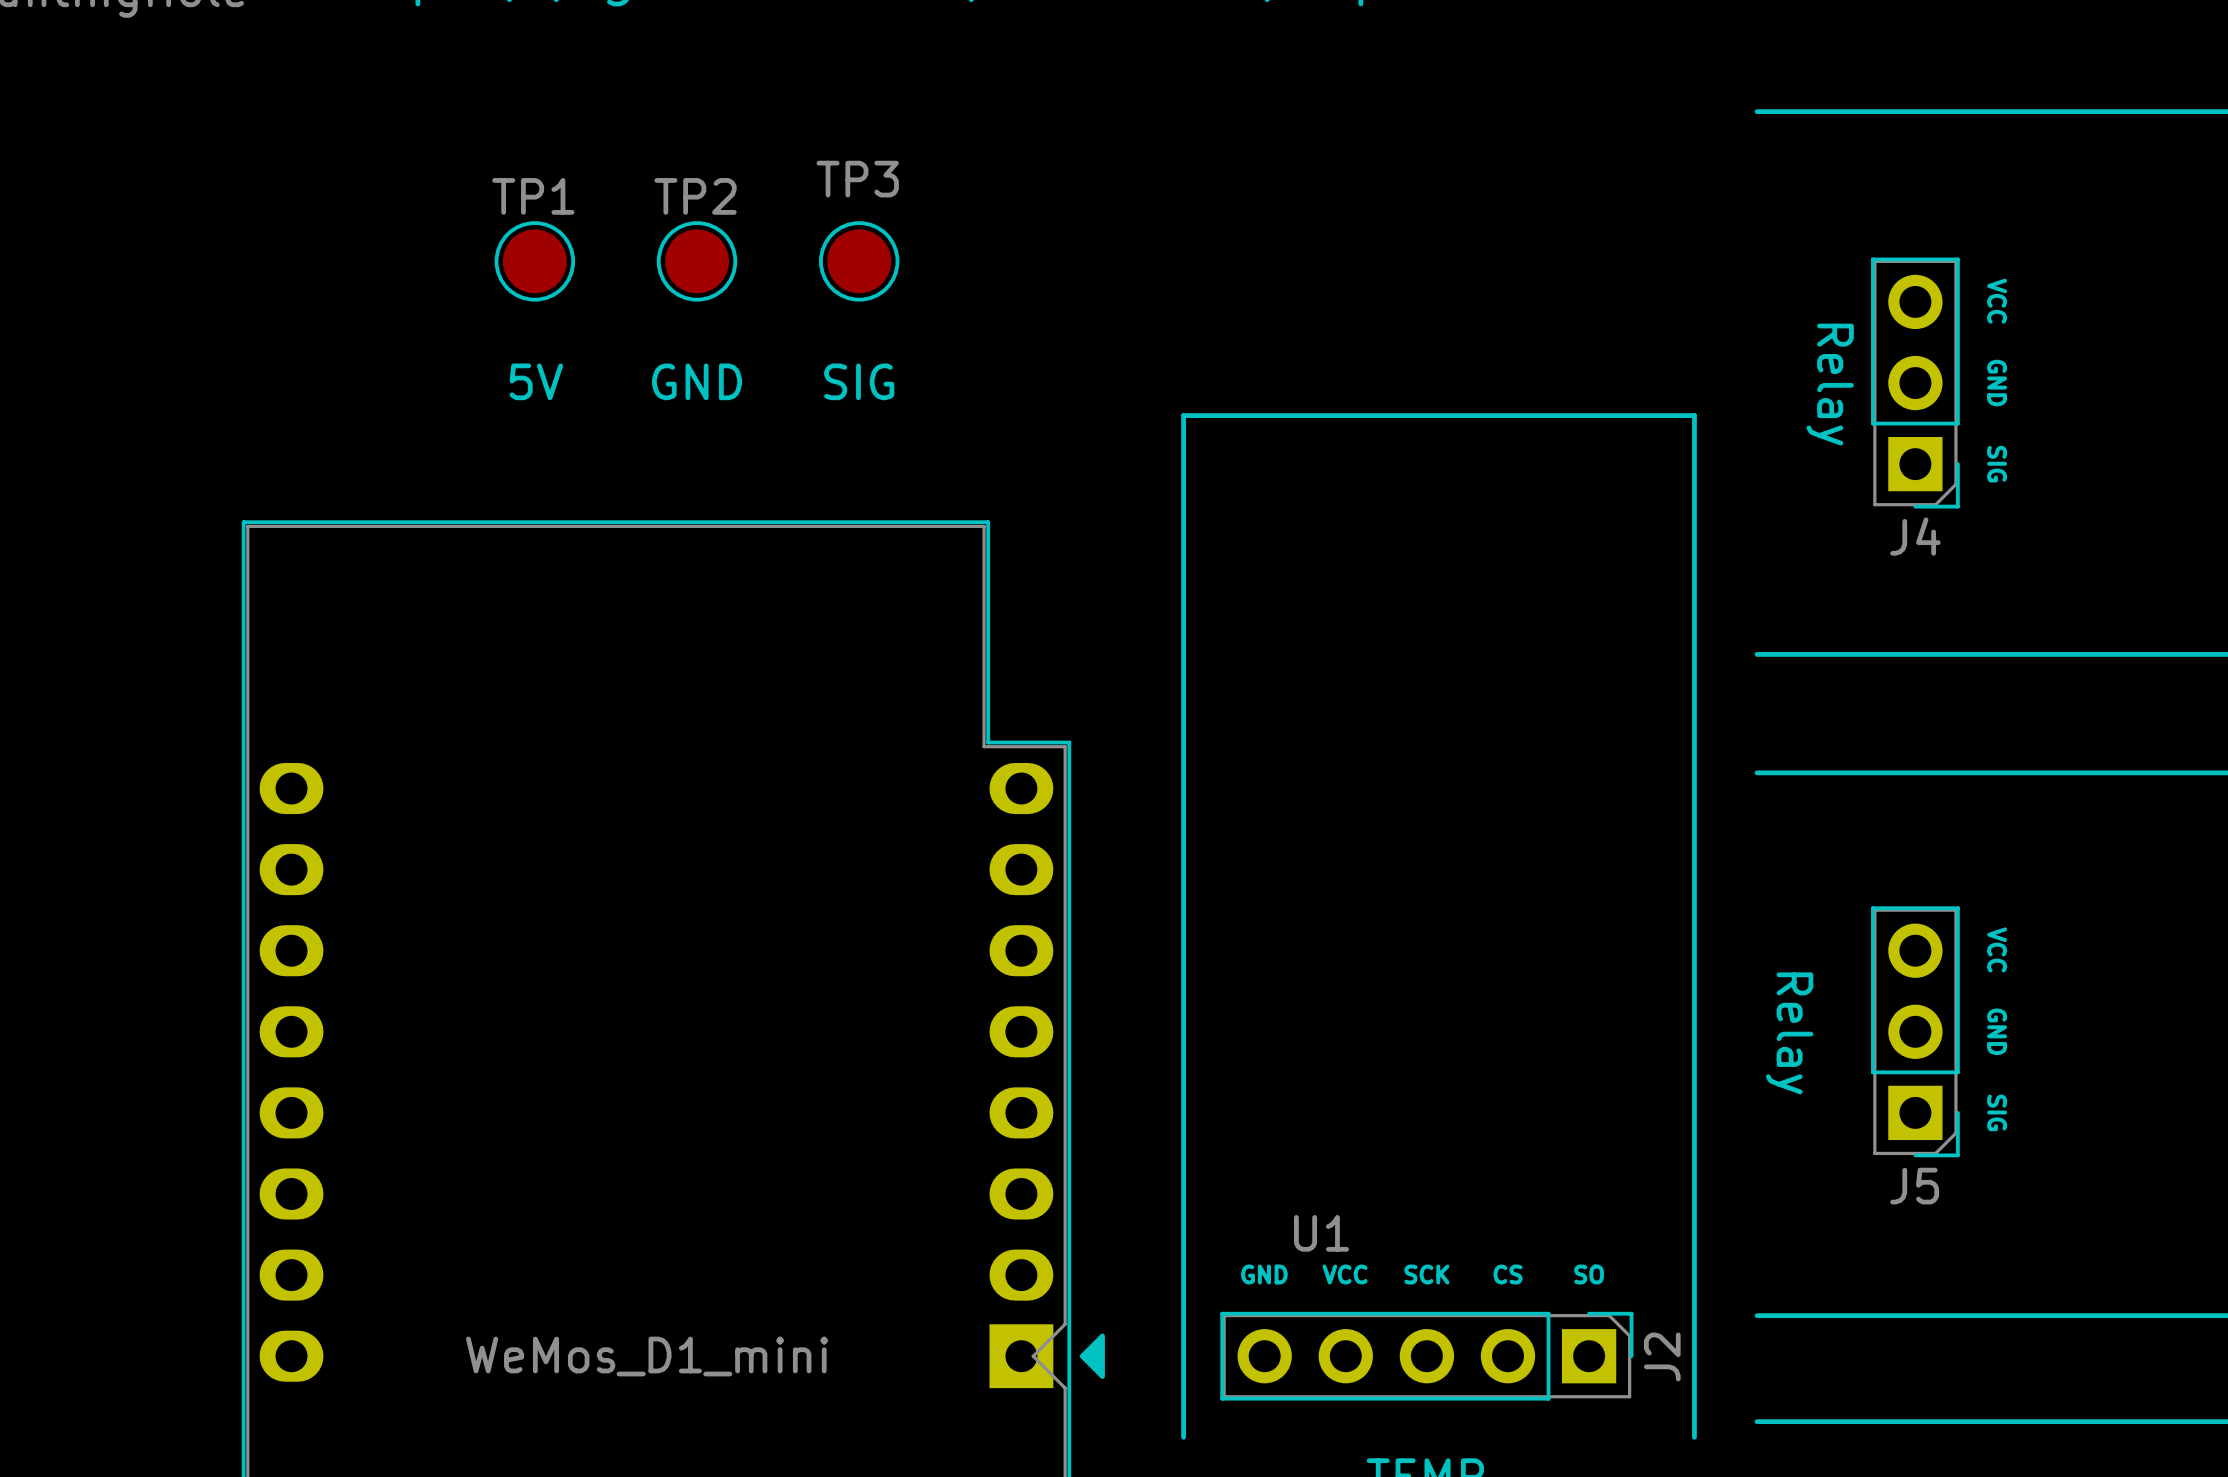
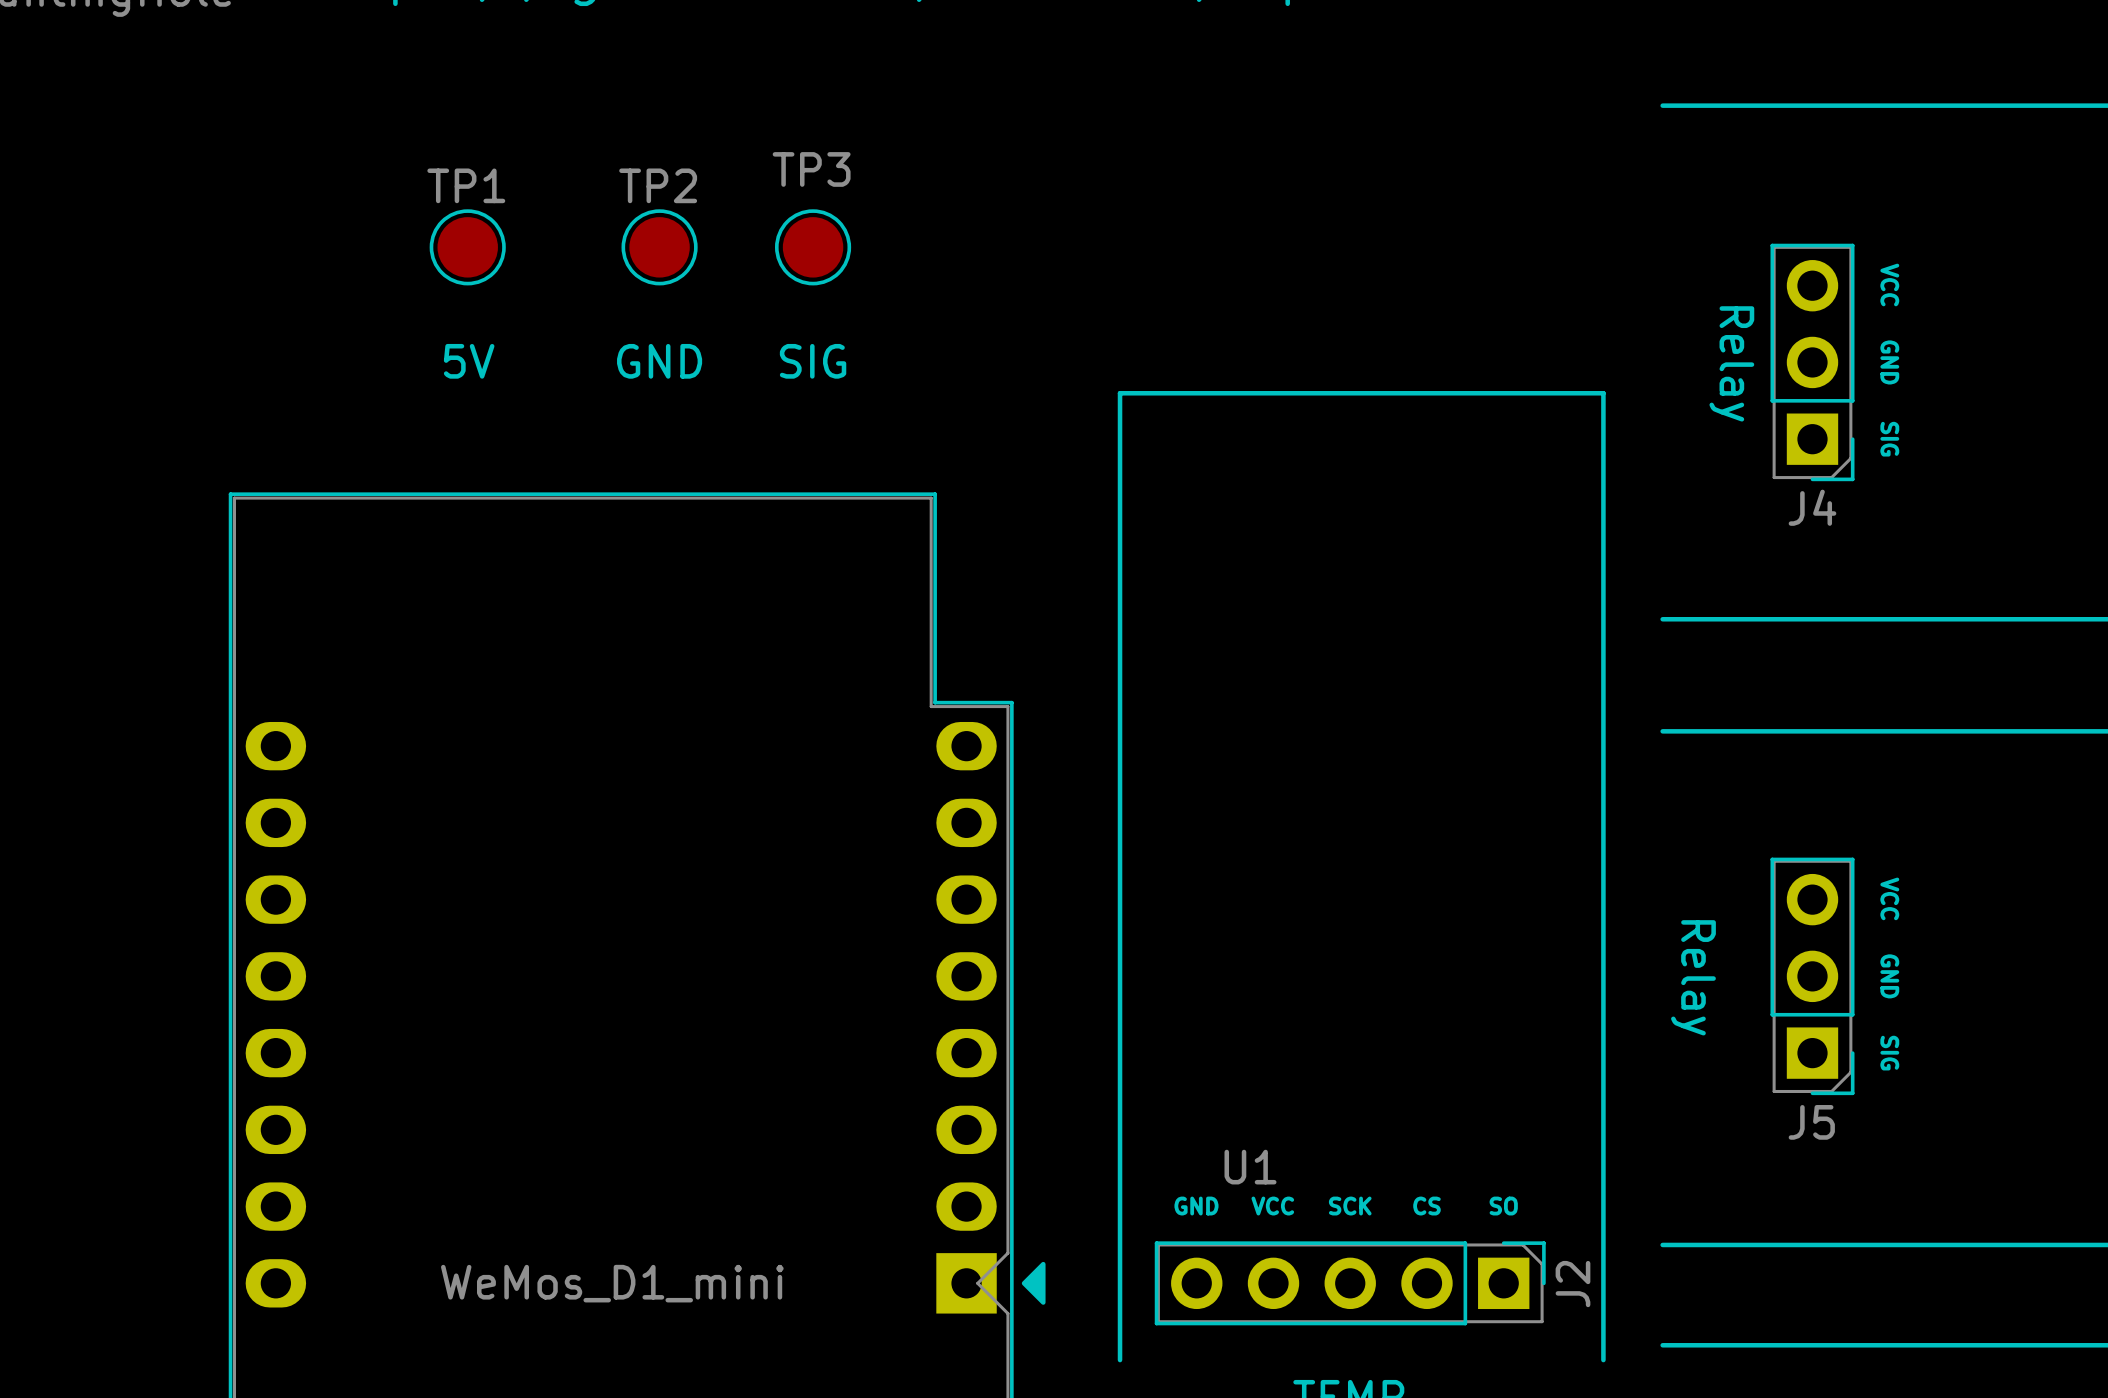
TP1 position: (534, 261) -> (467, 247)

